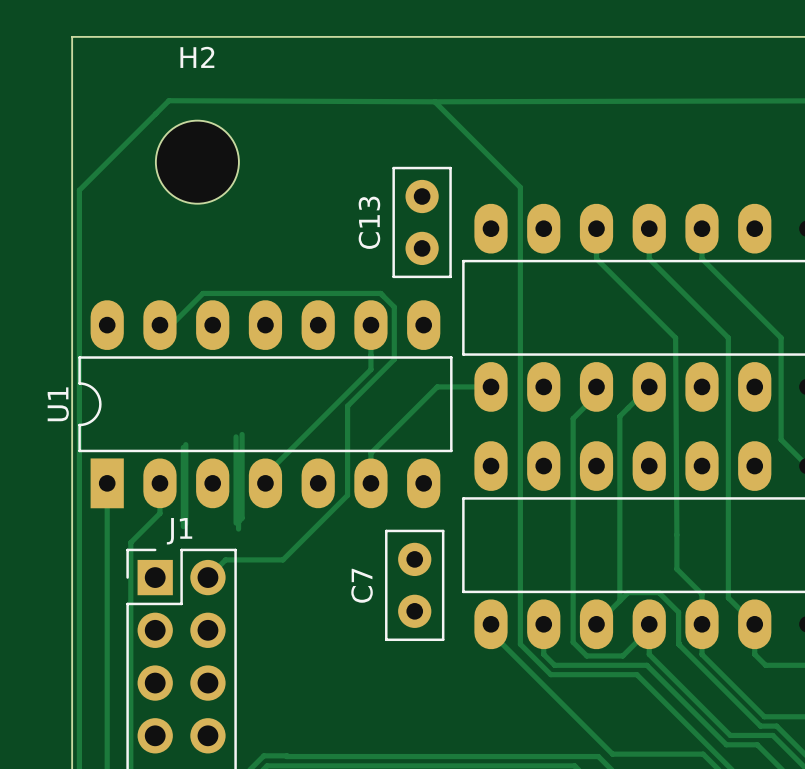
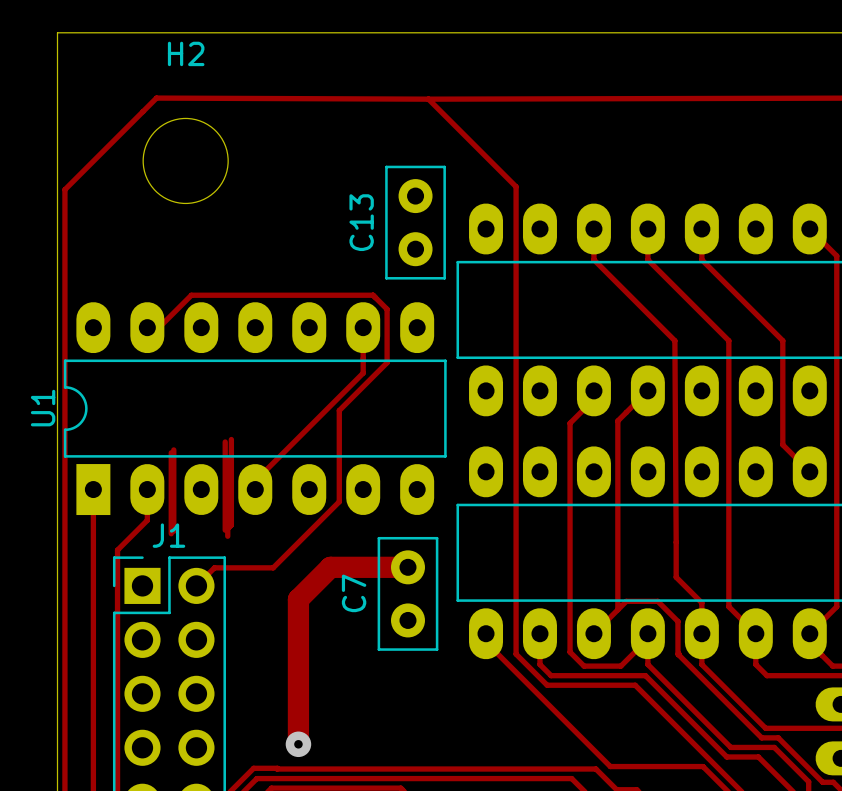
track: (491, 386) (437, 386) (370, 453) (370, 483) -> none
track: none -> (407, 567) (330, 567) (298, 599) (298, 744)
via: none -> (298, 744)

